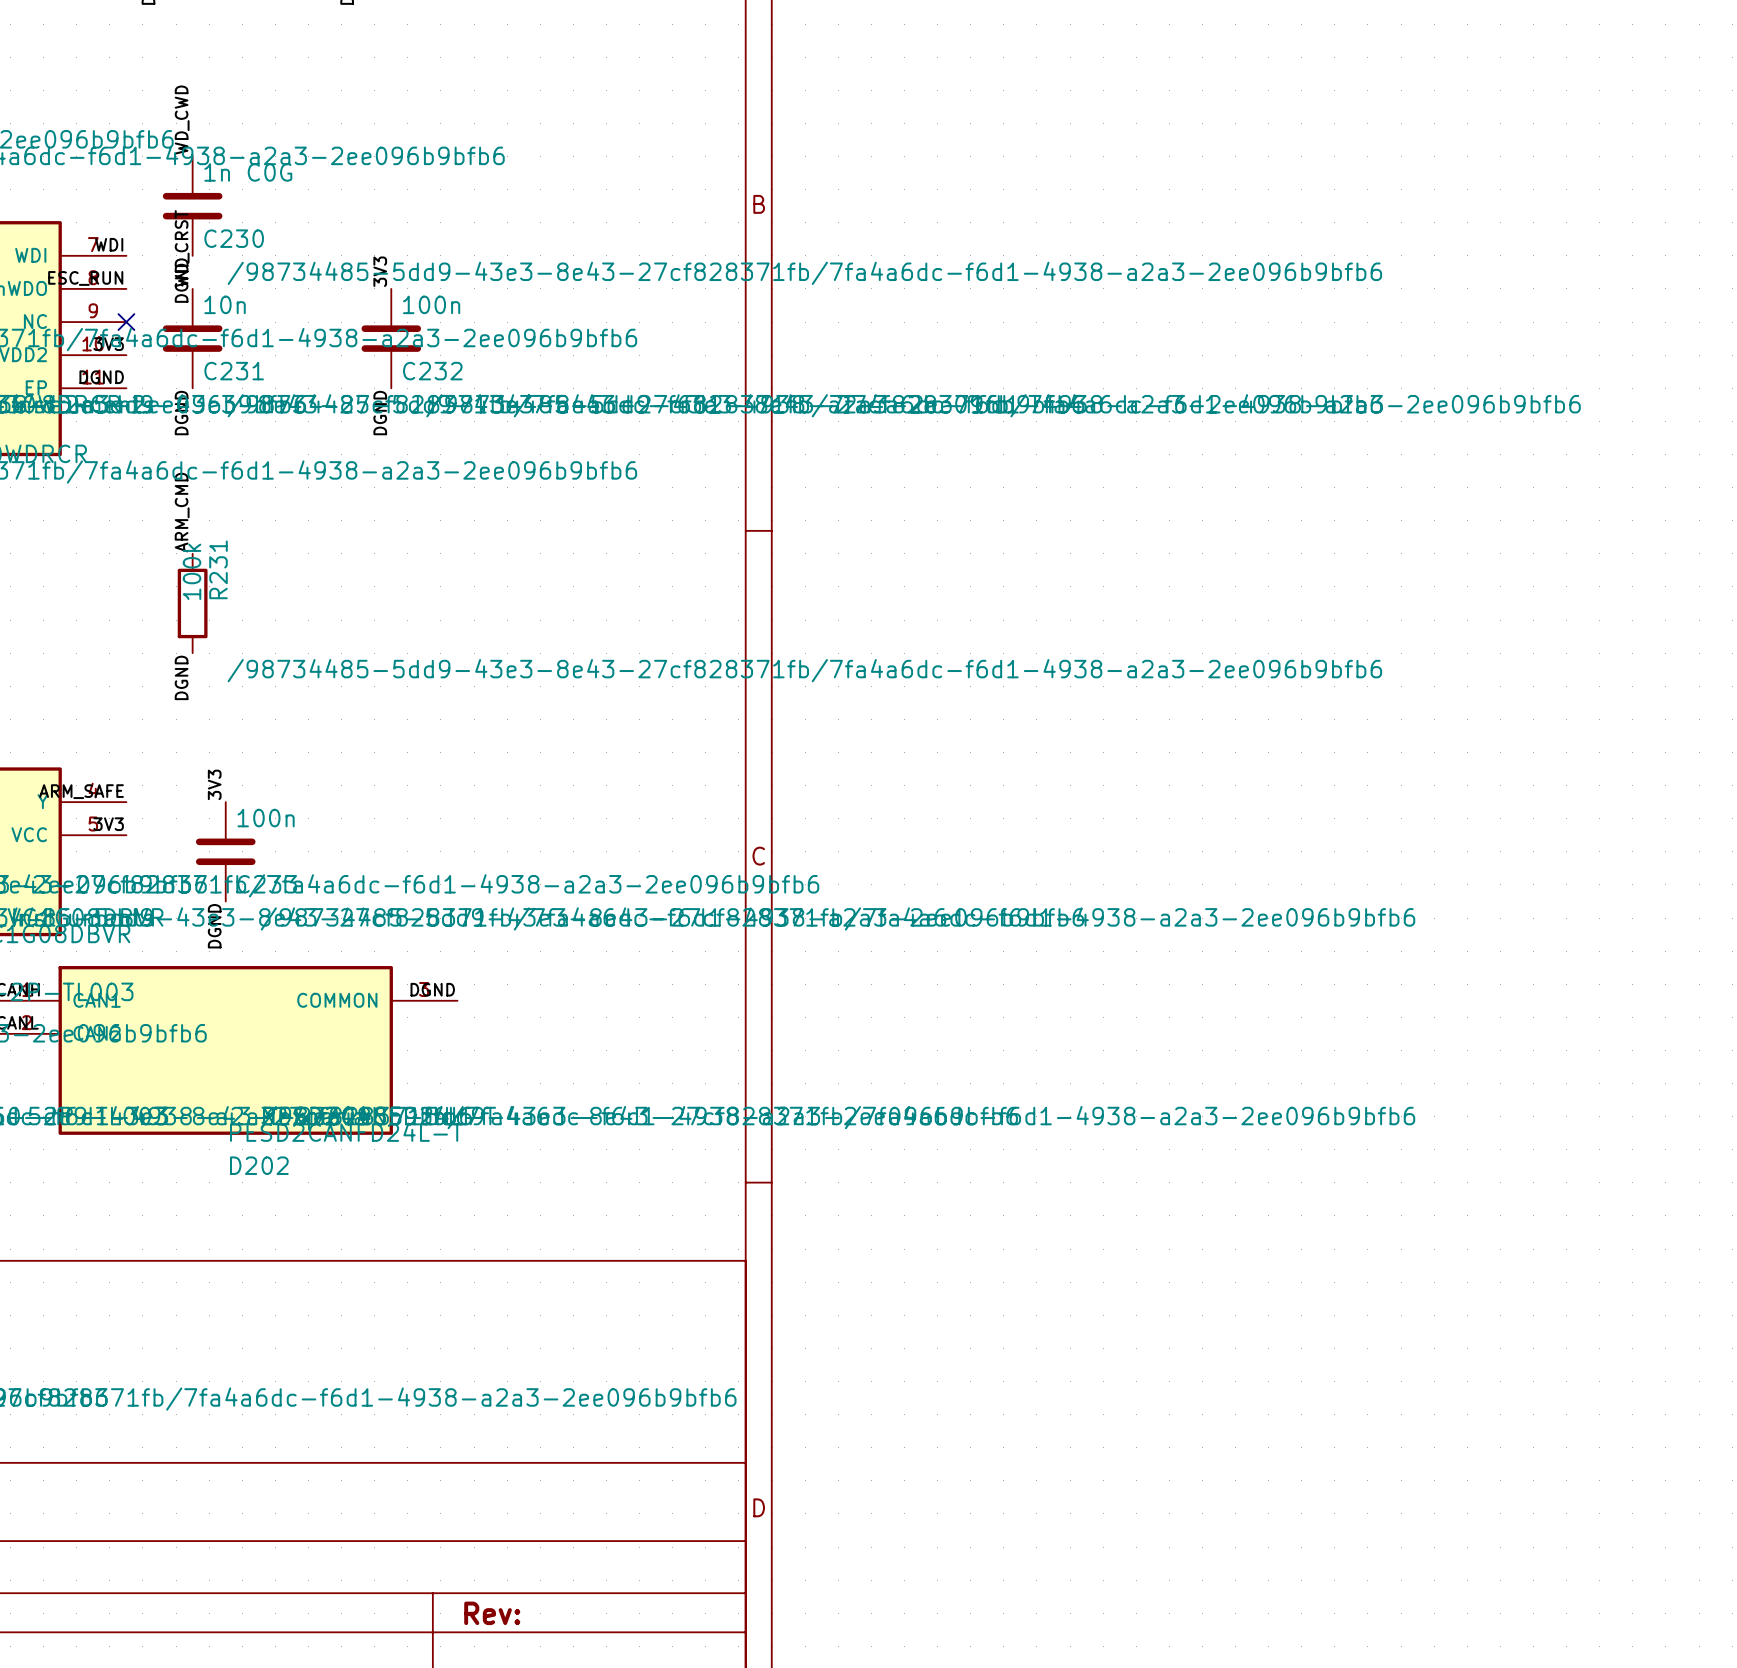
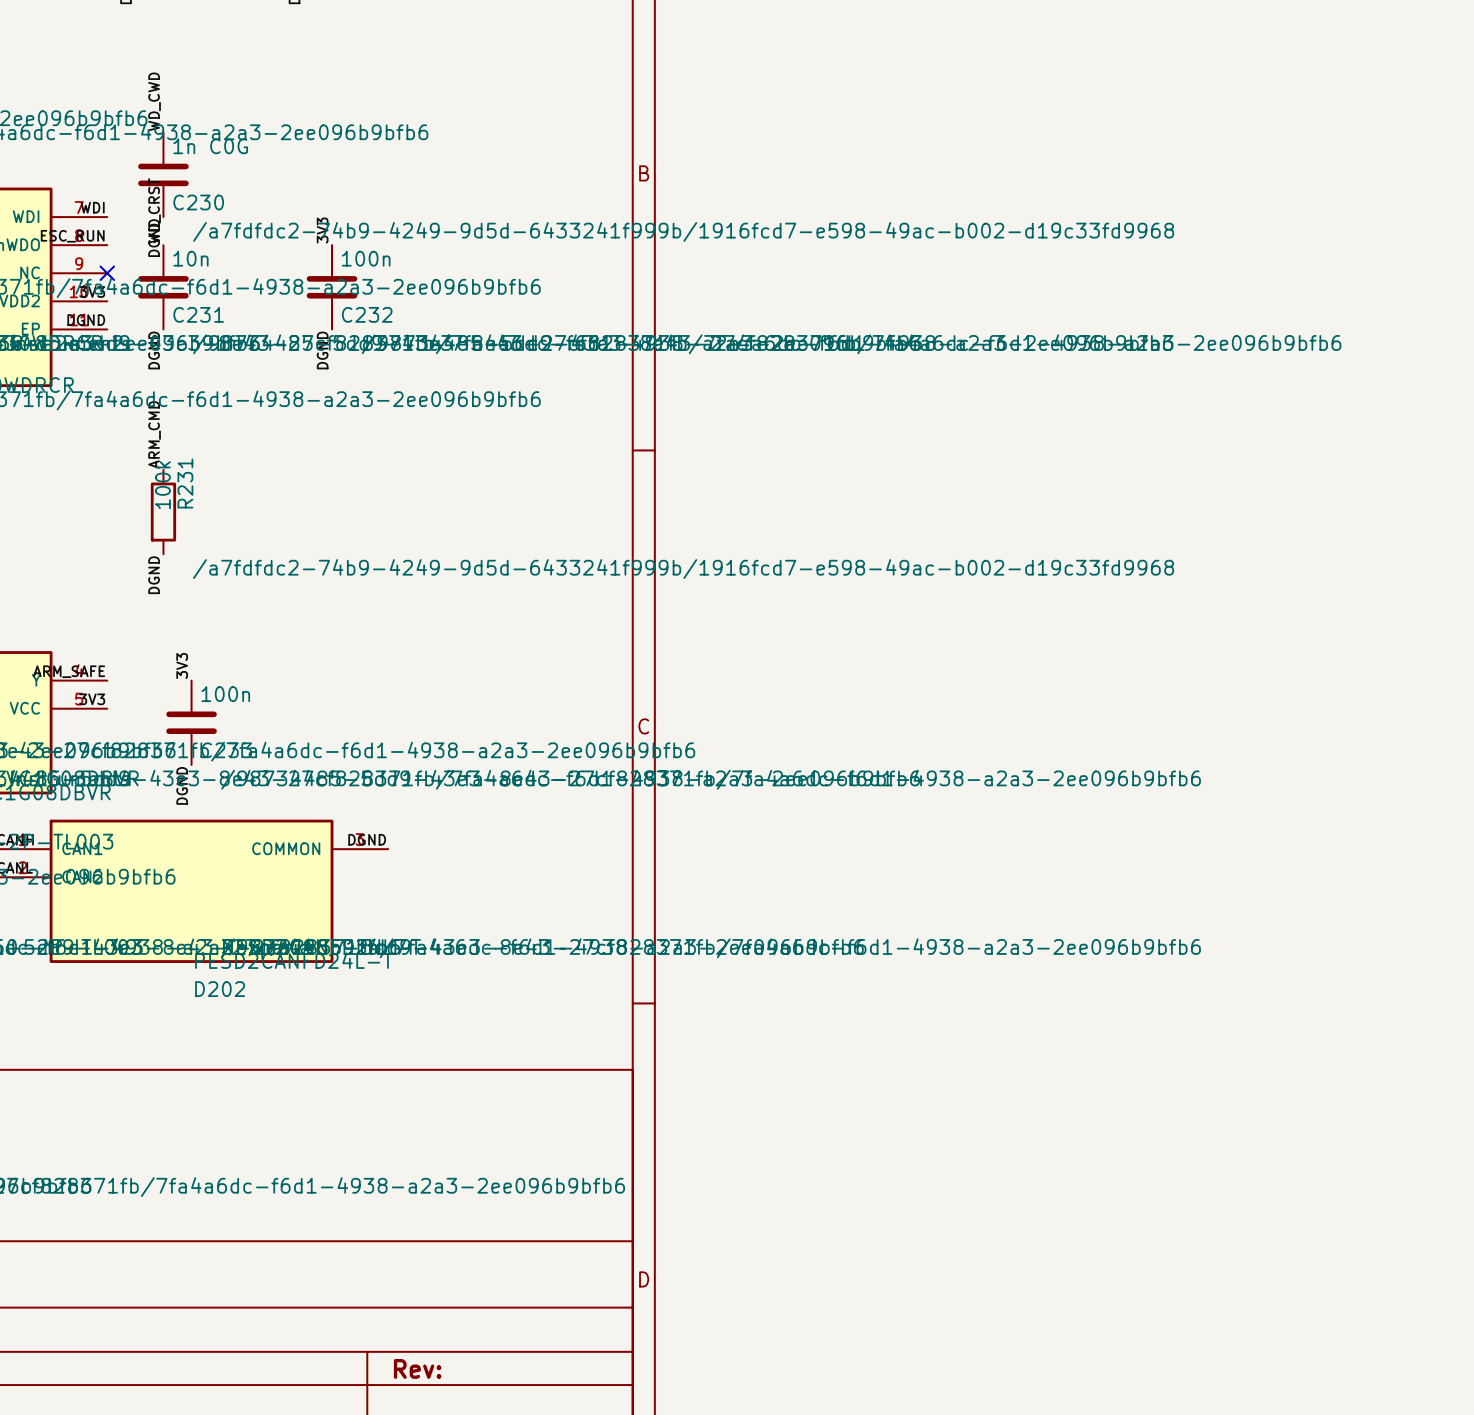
C230 text: /98734485-5dd9-43e3-8e43-27cf828371fb/7fa4a6dc-f6d1-4938-a2a3-2ee096b9bfb6 (804, 273) -> /a7fdfdc2-74b9-4249-9d5d-6433241f999b/1916fcd7-e598-49ac-b002-d19c33fd9968 (683, 231)
R231 text: /98734485-5dd9-43e3-8e43-27cf828371fb/7fa4a6dc-f6d1-4938-a2a3-2ee096b9bfb6 (804, 670) -> /a7fdfdc2-74b9-4249-9d5d-6433241f999b/1916fcd7-e598-49ac-b002-d19c33fd9968 (683, 569)

